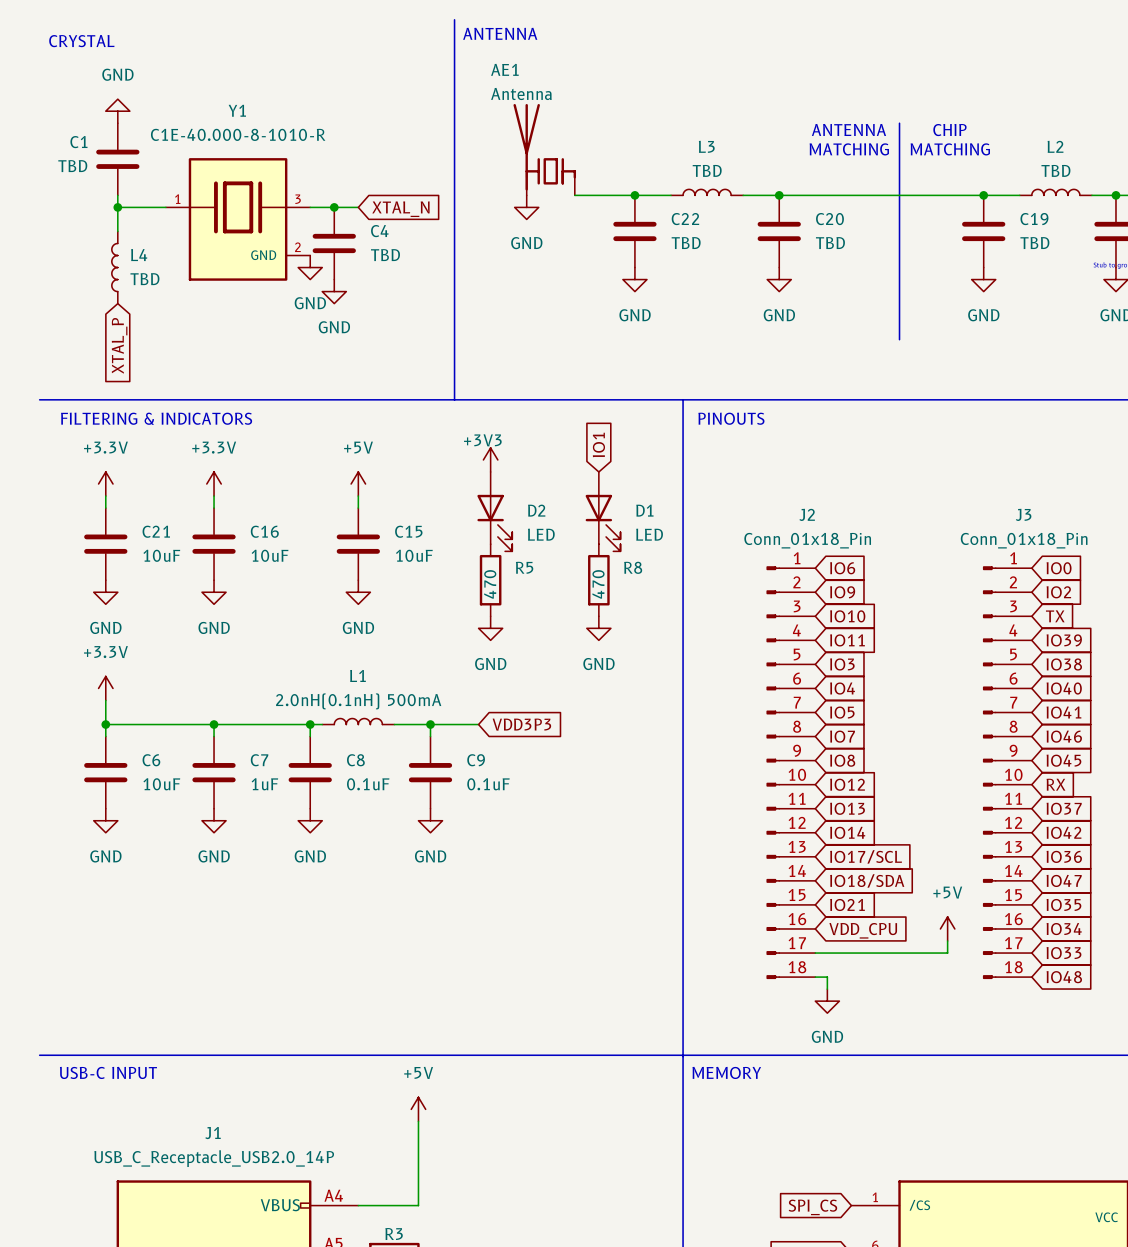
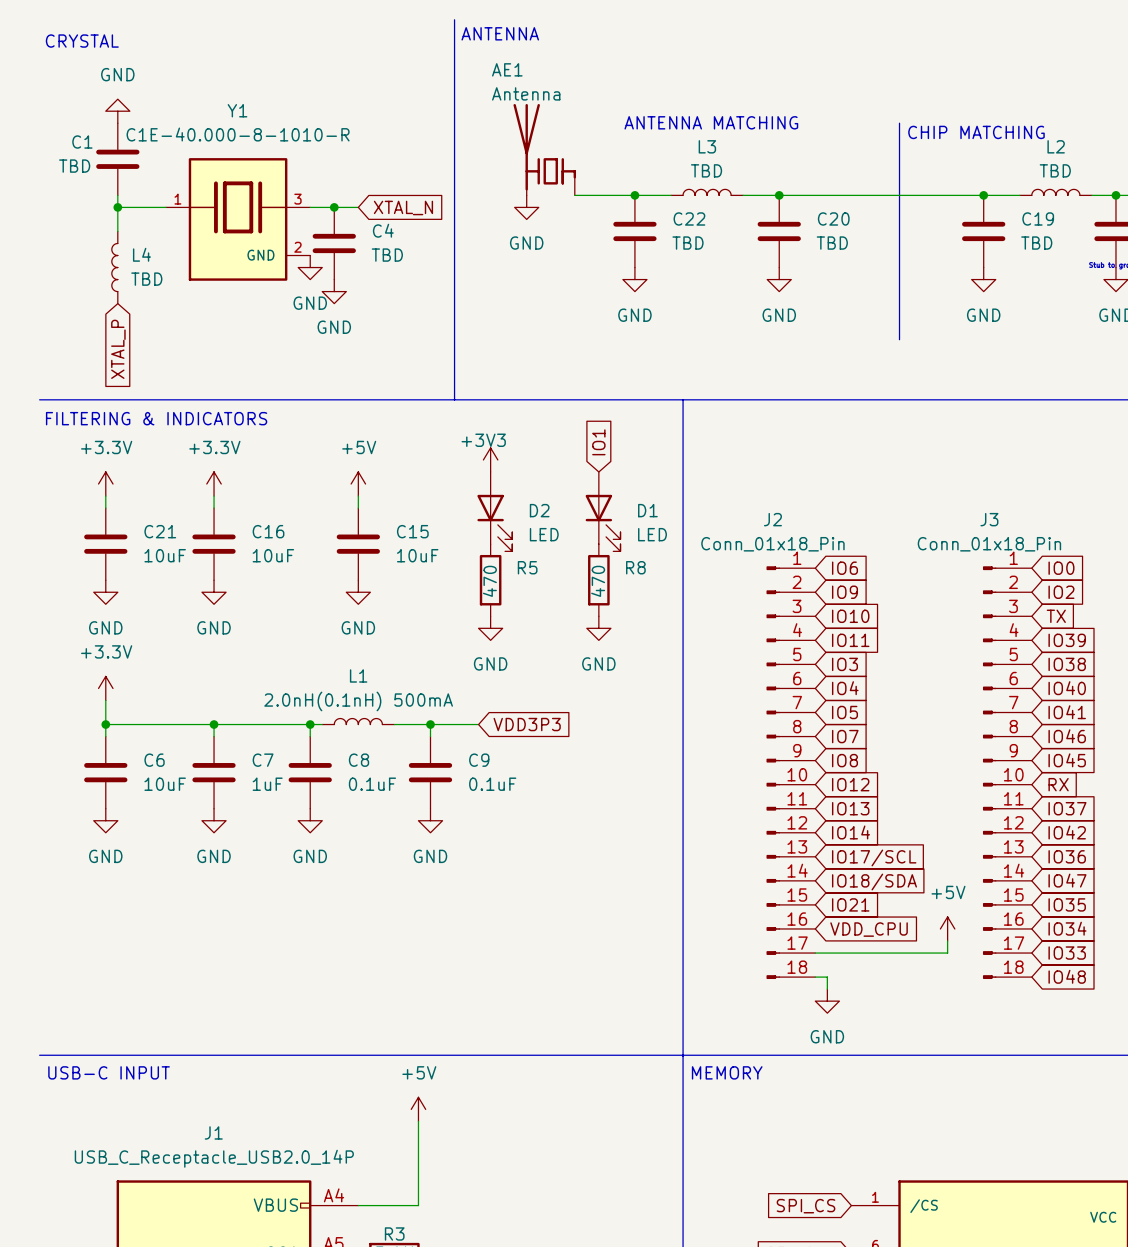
text: ANTENNA (848, 129) -> ANTENNA MATCHING (711, 122)
text: CHIP (949, 130) -> none
text: MATCHING (849, 149) -> none
text: MATCHING (950, 149) -> CHIP MATCHING (976, 132)
text: PINOUTS (731, 418) -> none
J2 name position: J2 (807, 514) -> J2 (772, 519)
J3 name position: J3 (1023, 514) -> J3 (989, 519)
J2 value position: Conn_01x18_Pin (807, 540) -> Conn_01x18_Pin (772, 544)
J3 value position: Conn_01x18_Pin (1024, 540) -> Conn_01x18_Pin (989, 544)

